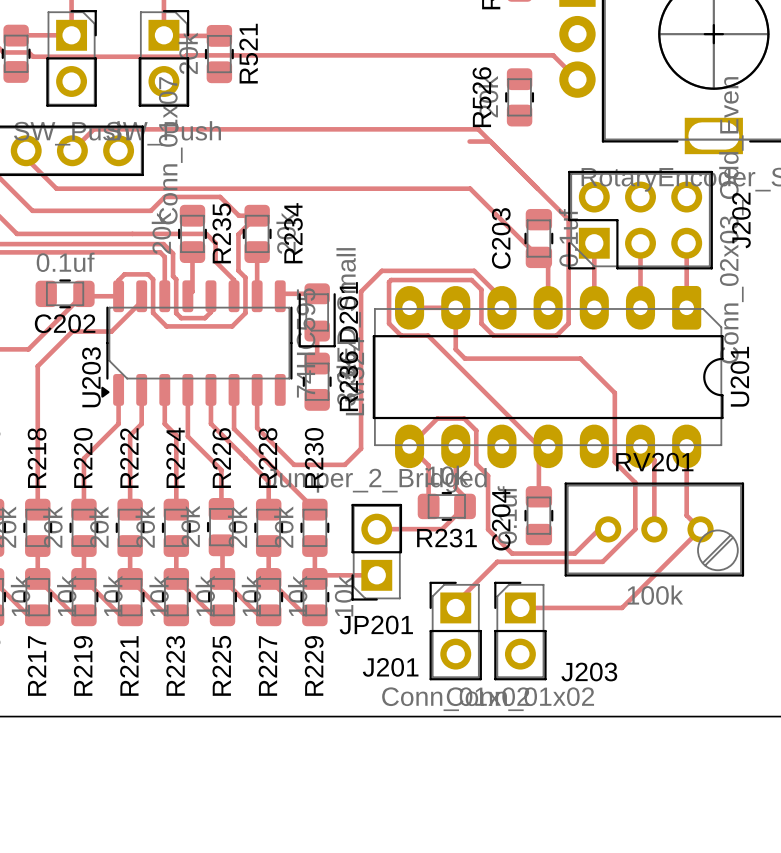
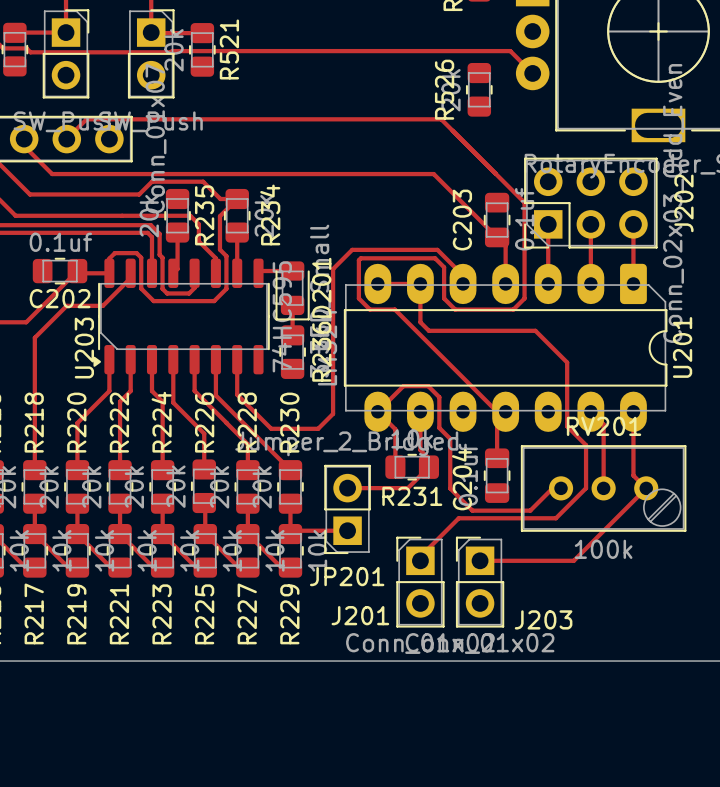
track: (469, 141) (490, 141) -> none

